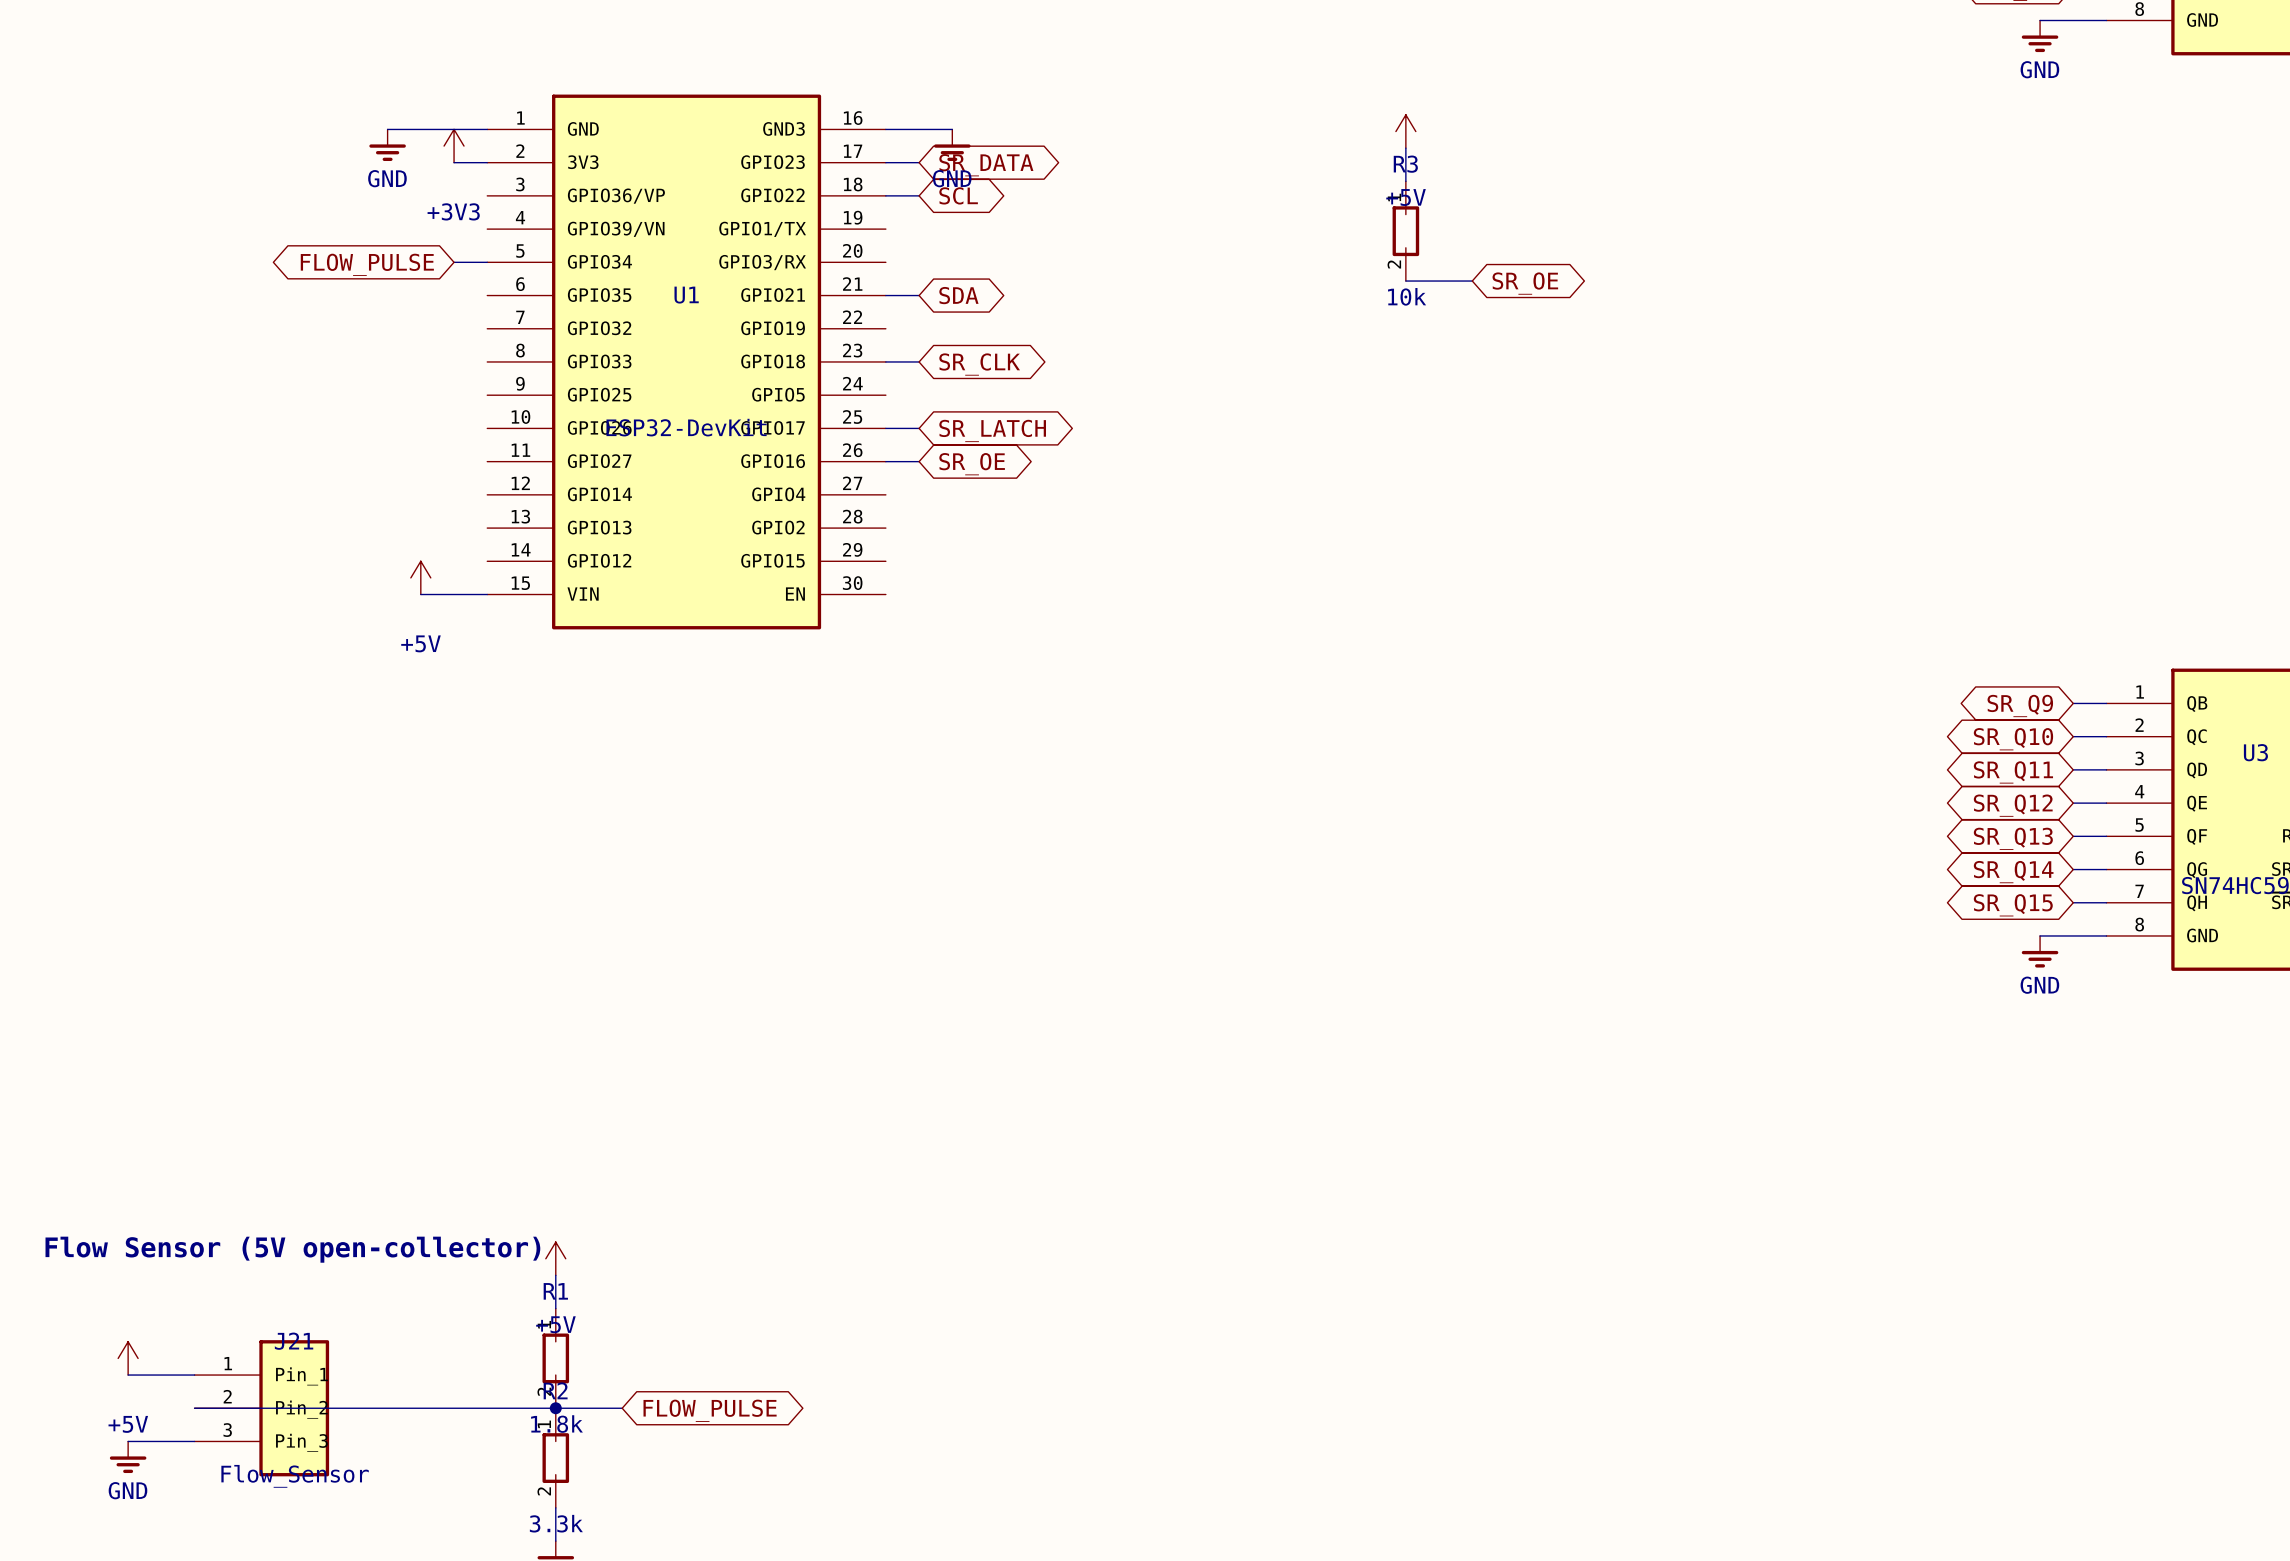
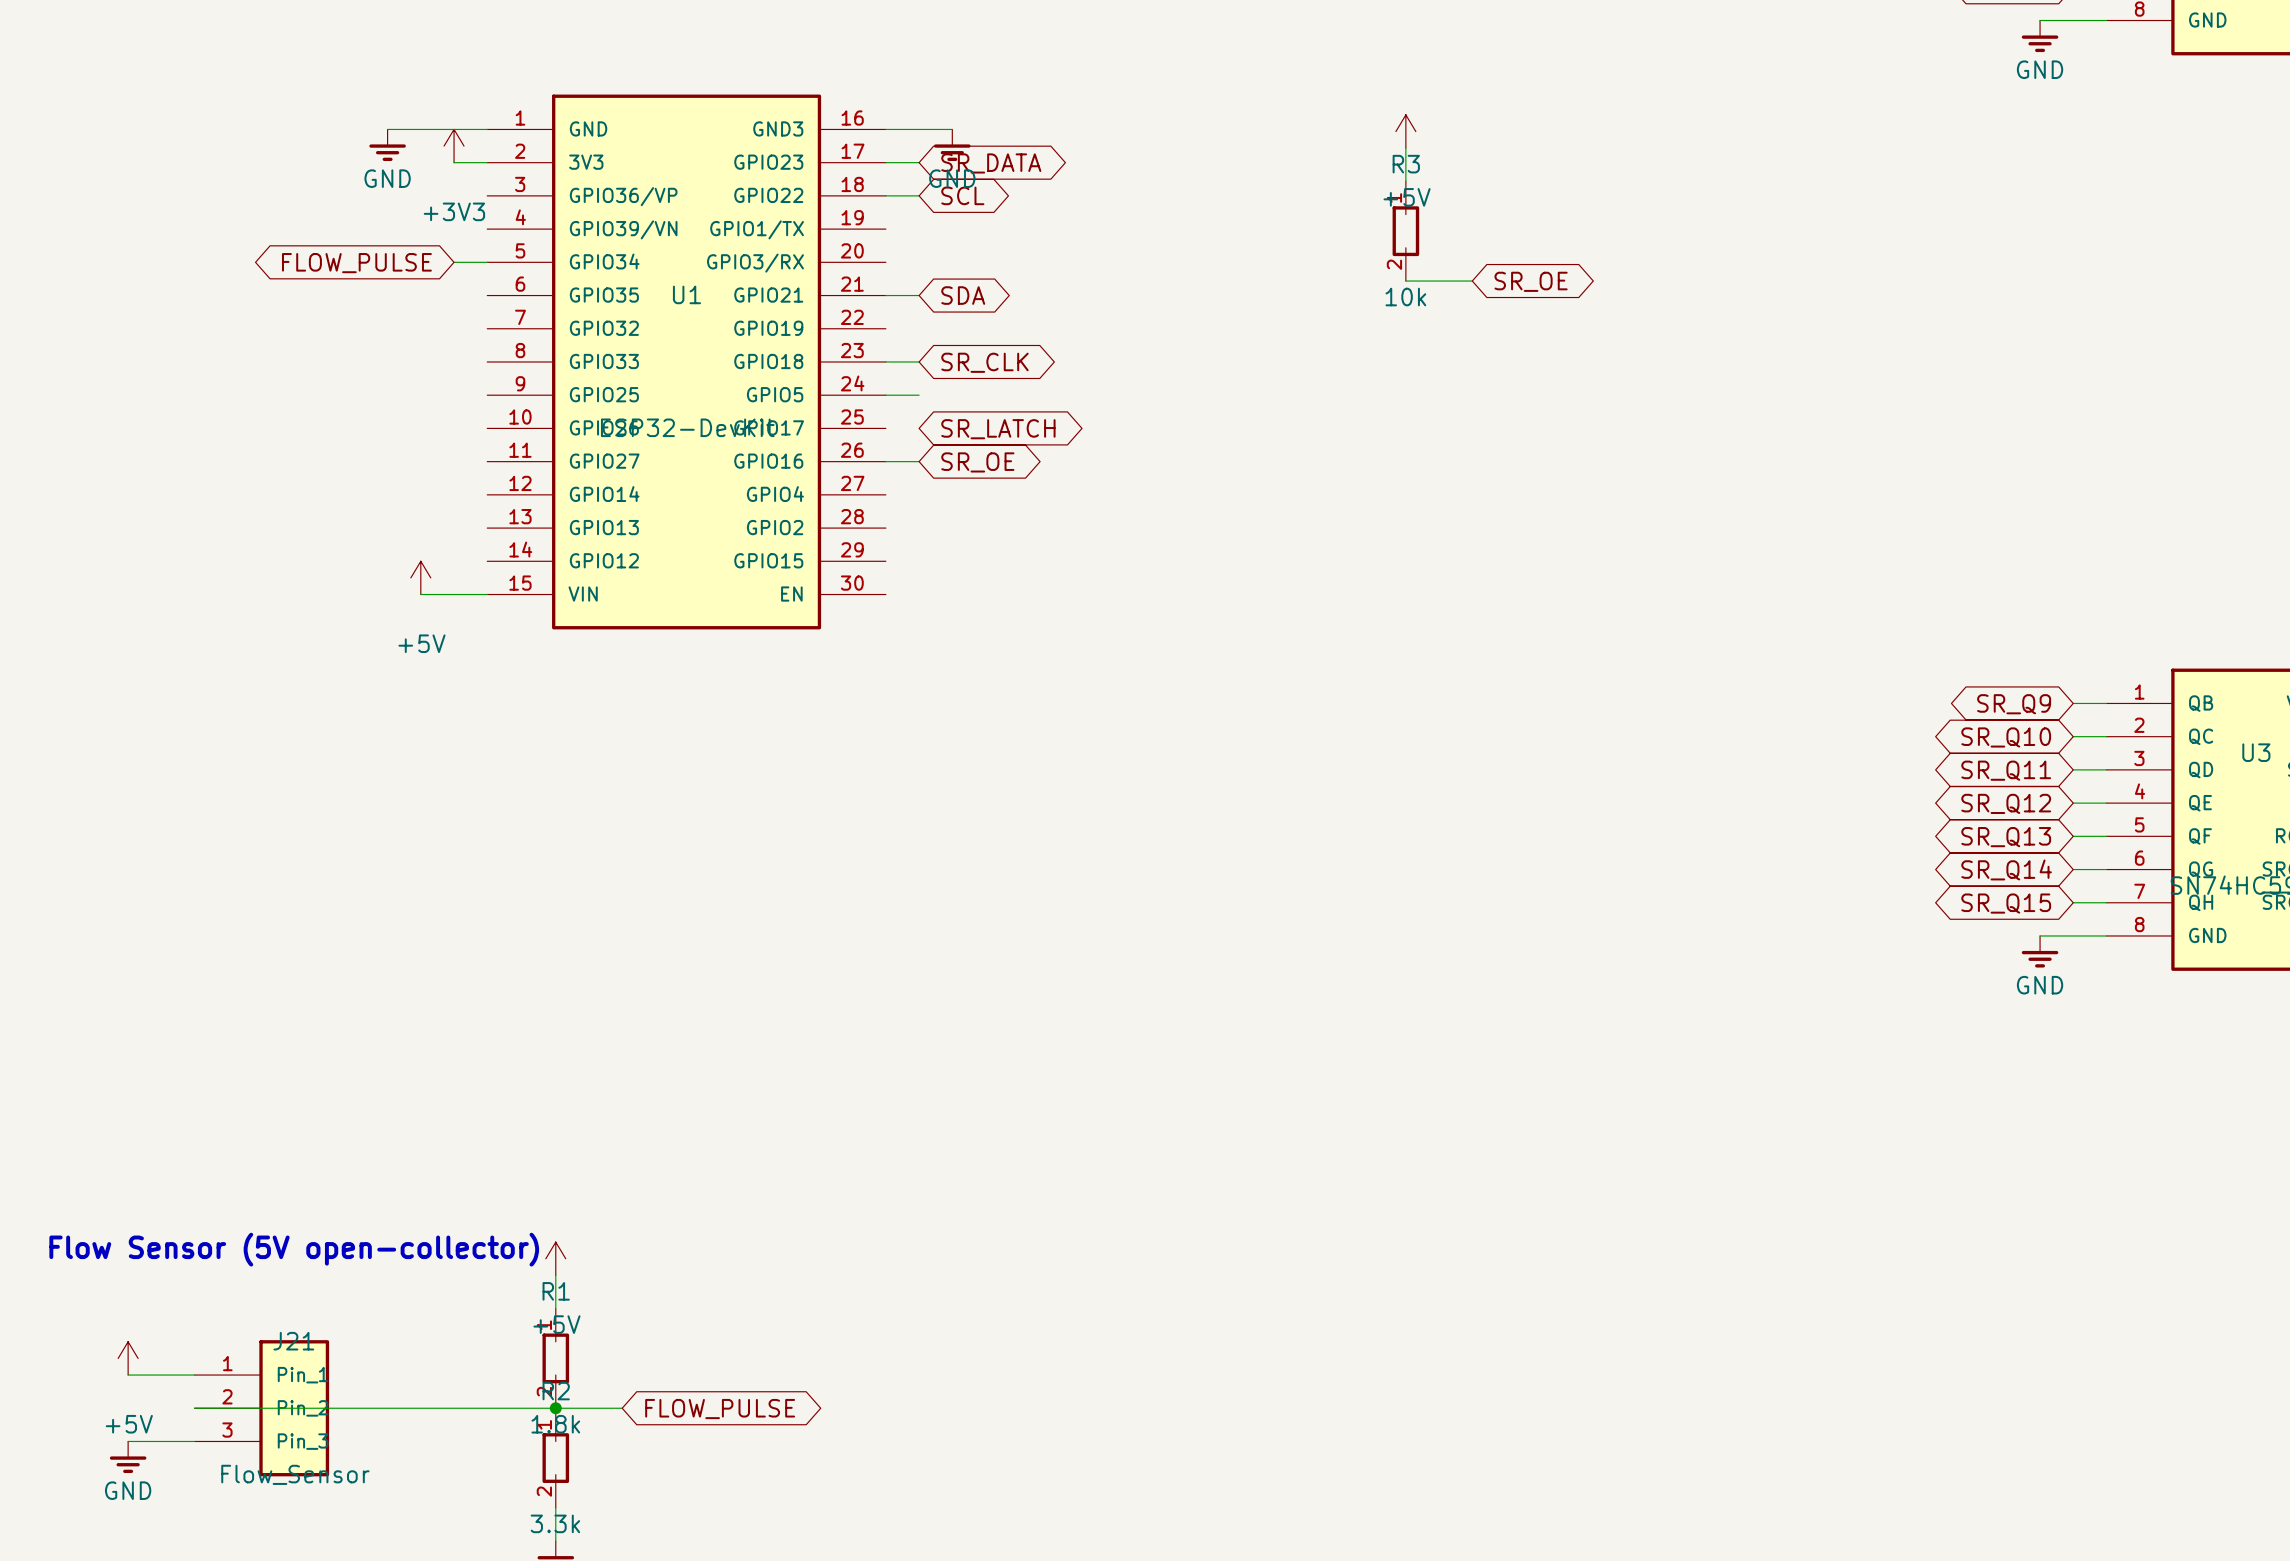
wire: (885, 428) (919, 428) -> (885, 395) (919, 395)

